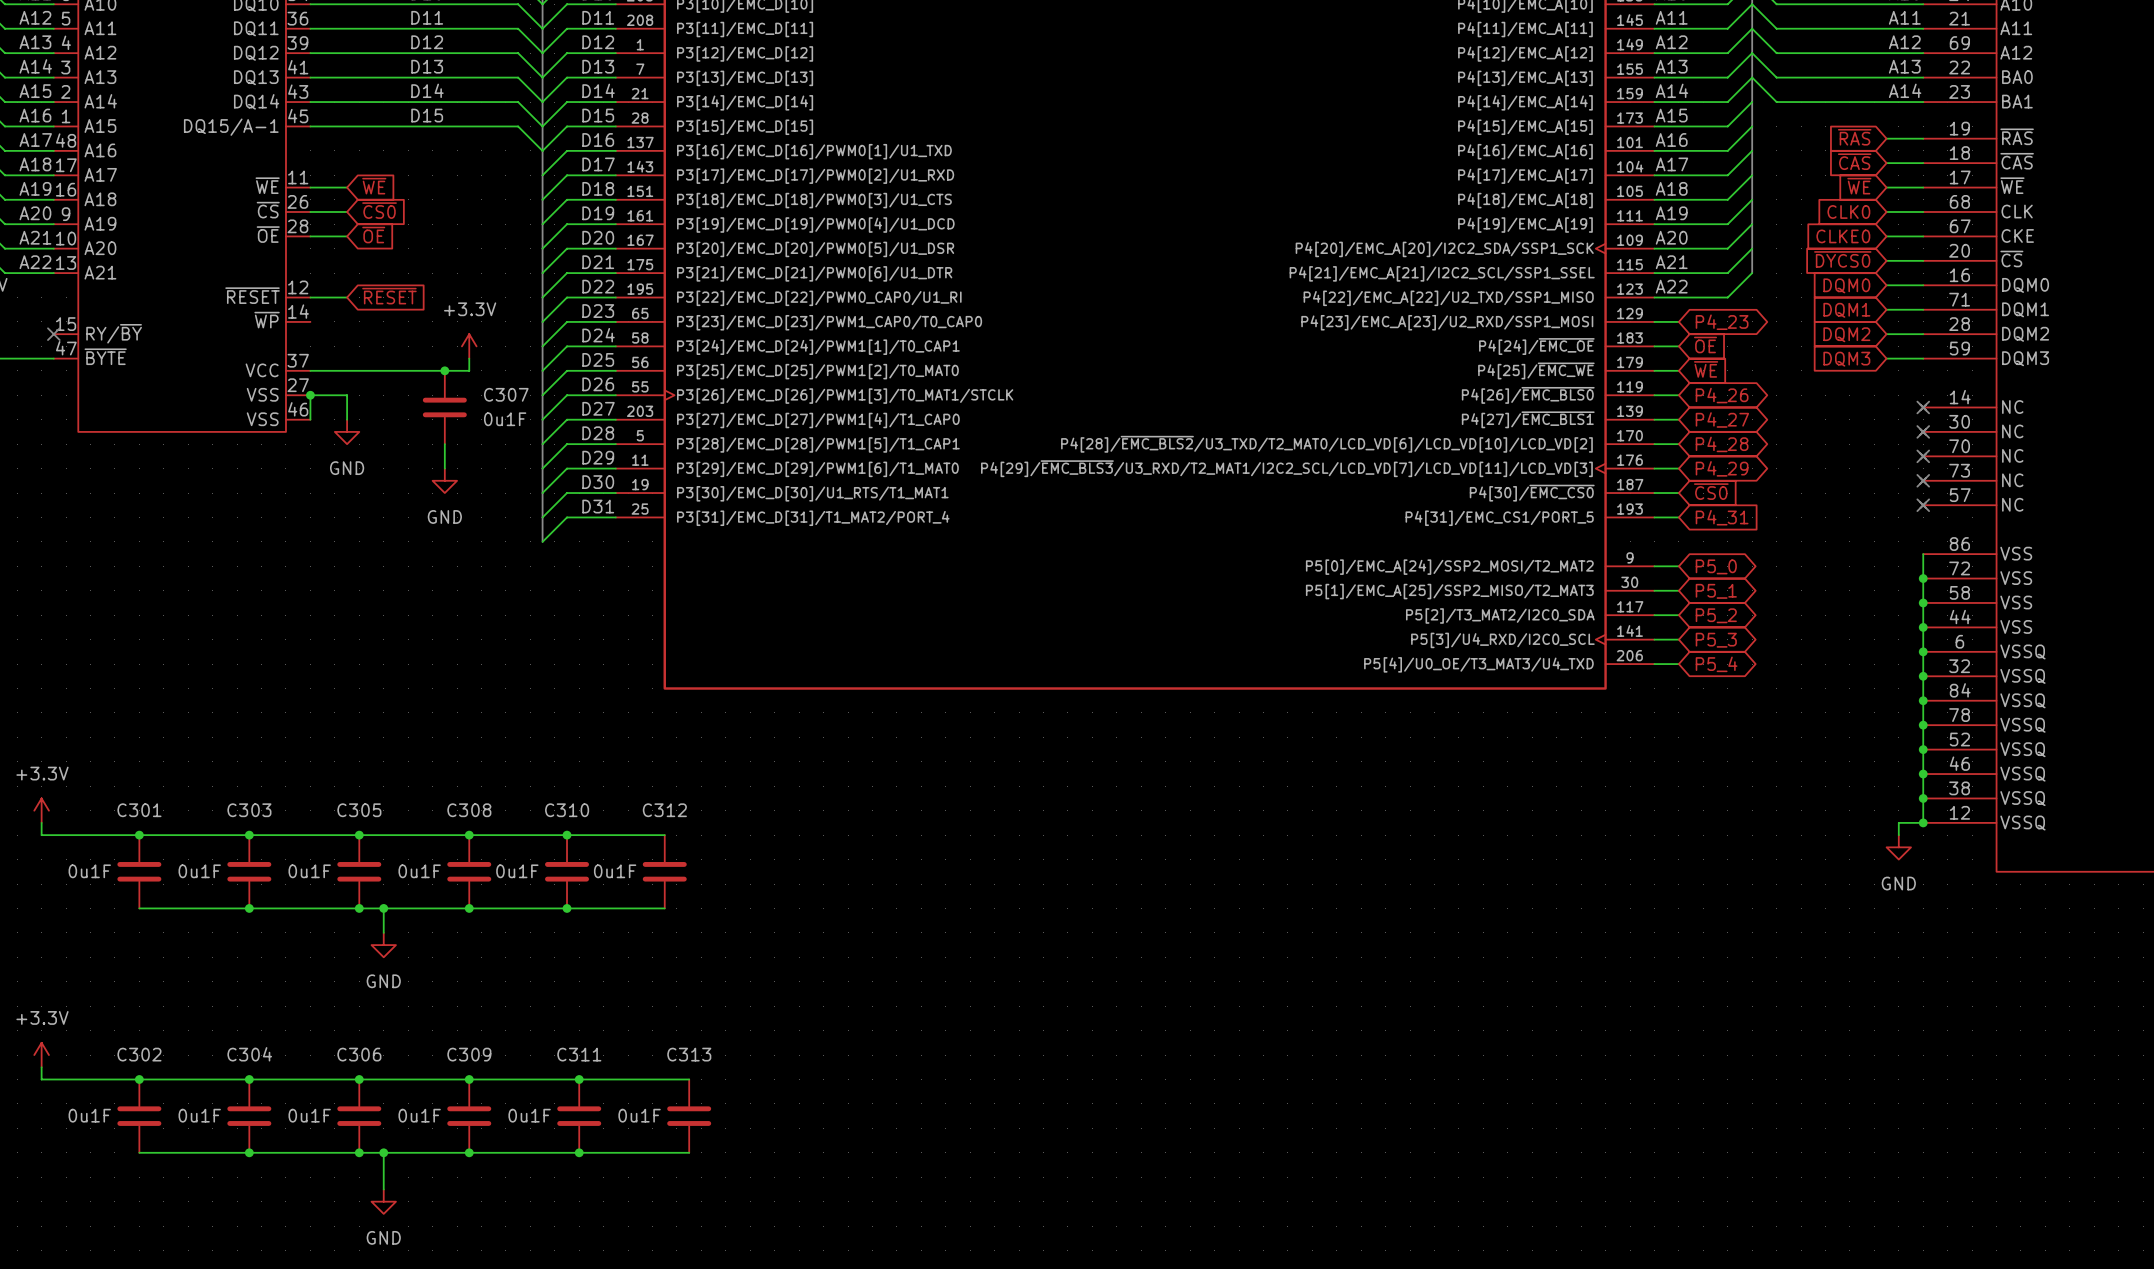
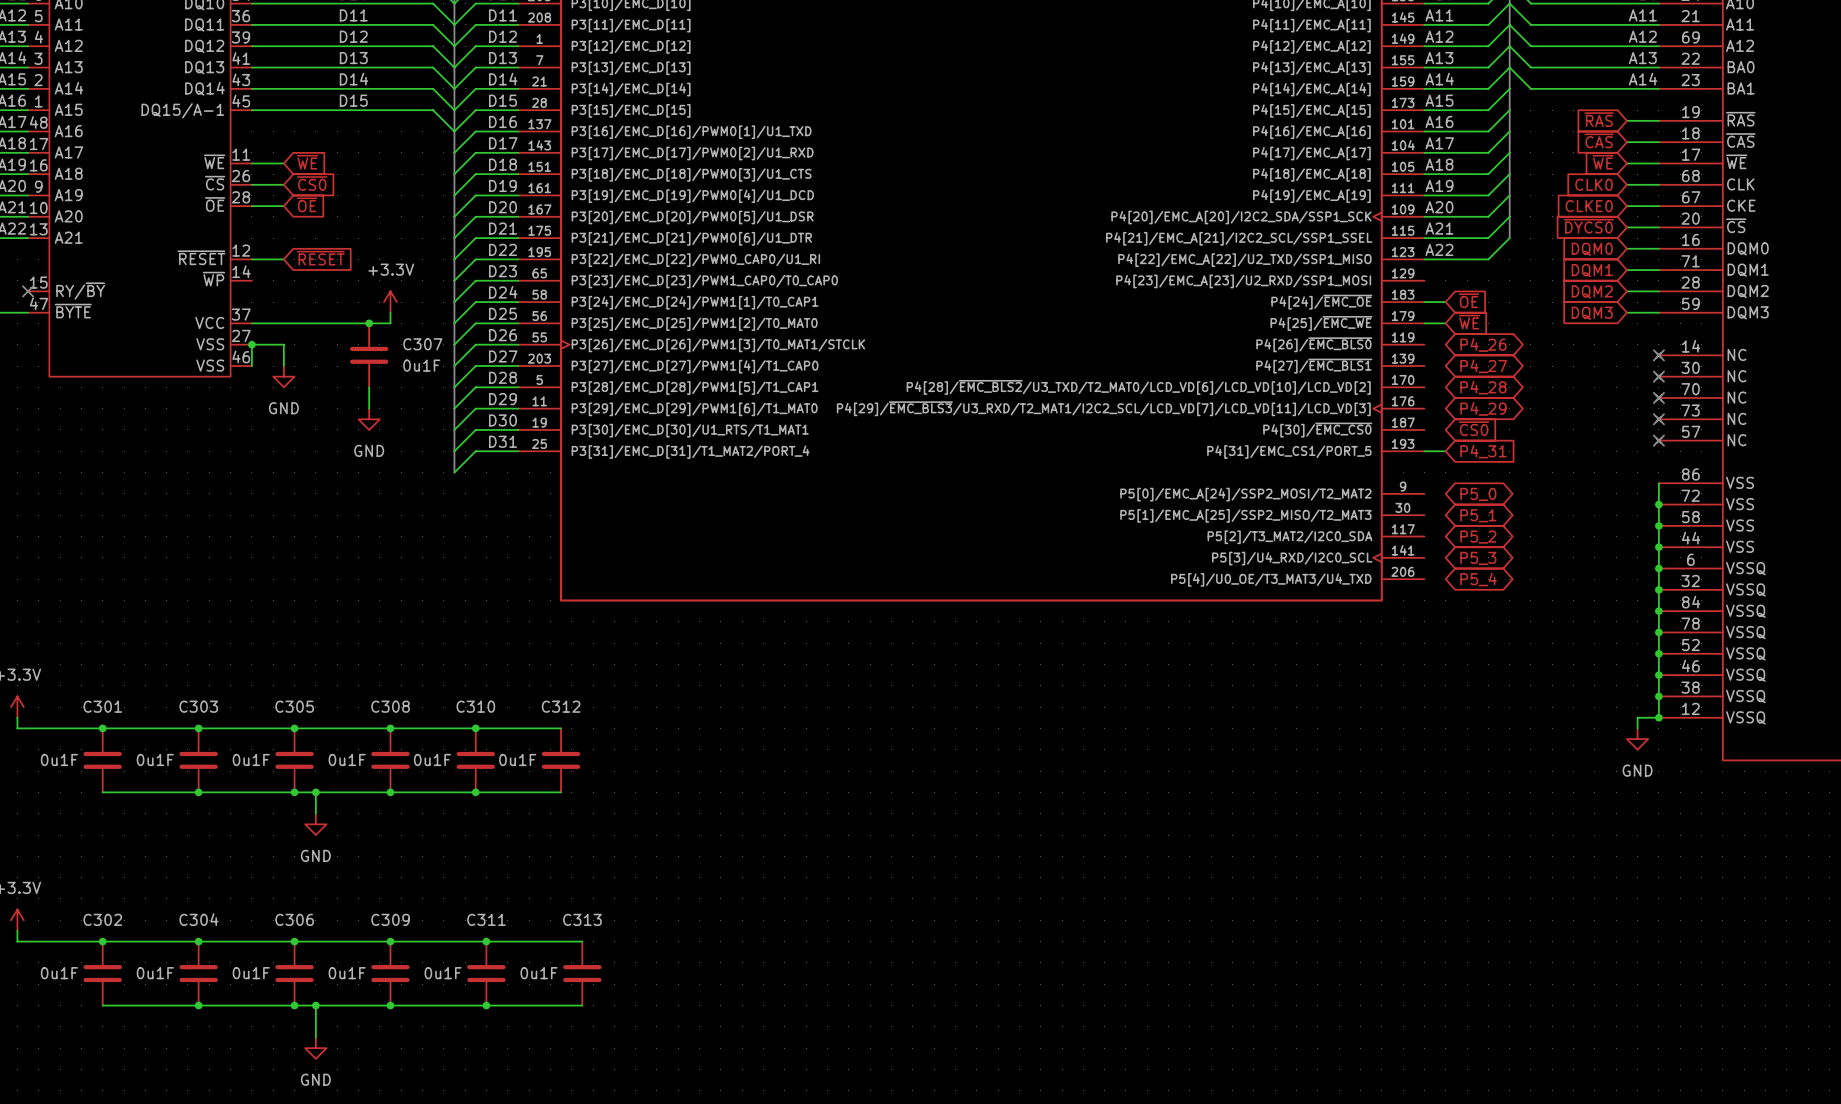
wire: (1654, 321) (1678, 321) -> none
global label: P4_23 (1722, 322) -> none
wire: (1654, 395) (1678, 395) -> none
wire: (1654, 419) (1678, 419) -> none
wire: (1654, 444) (1678, 444) -> none
wire: (1654, 468) (1678, 468) -> none
wire: (1654, 493) (1678, 493) -> none
wire: (1654, 566) (1678, 566) -> none
wire: (1654, 590) (1678, 590) -> none
wire: (1654, 615) (1678, 615) -> none
wire: (1654, 639) (1678, 639) -> none
wire: (1654, 664) (1678, 664) -> none

